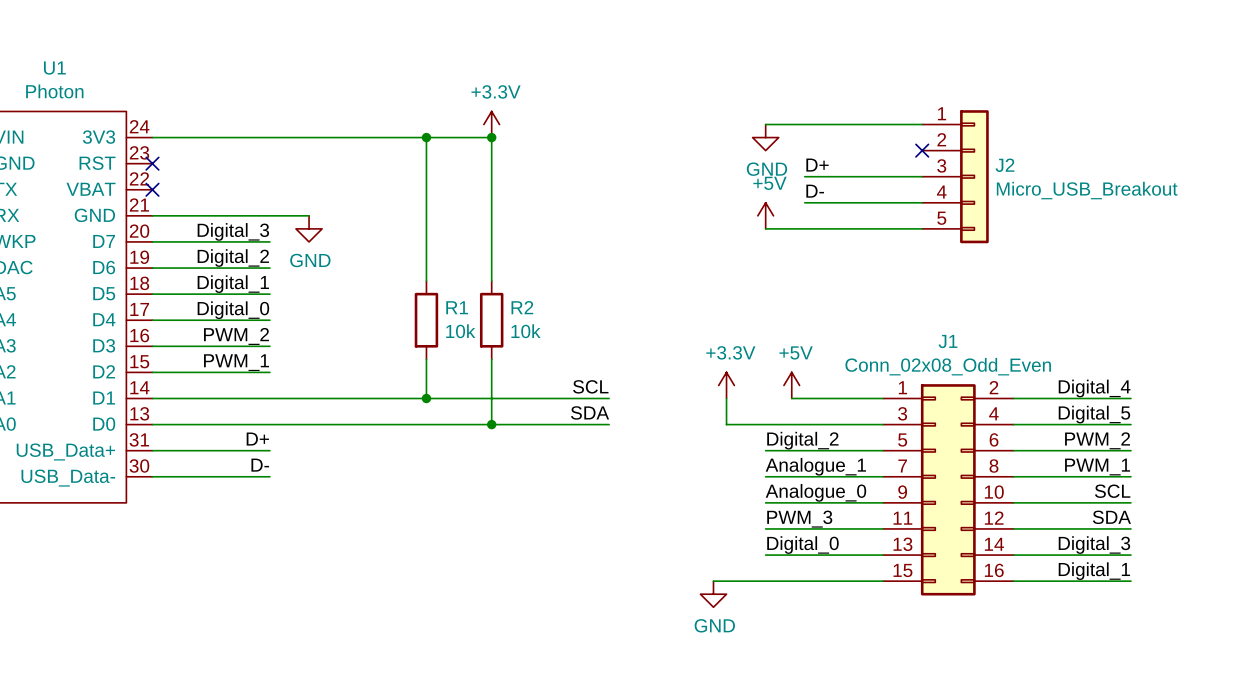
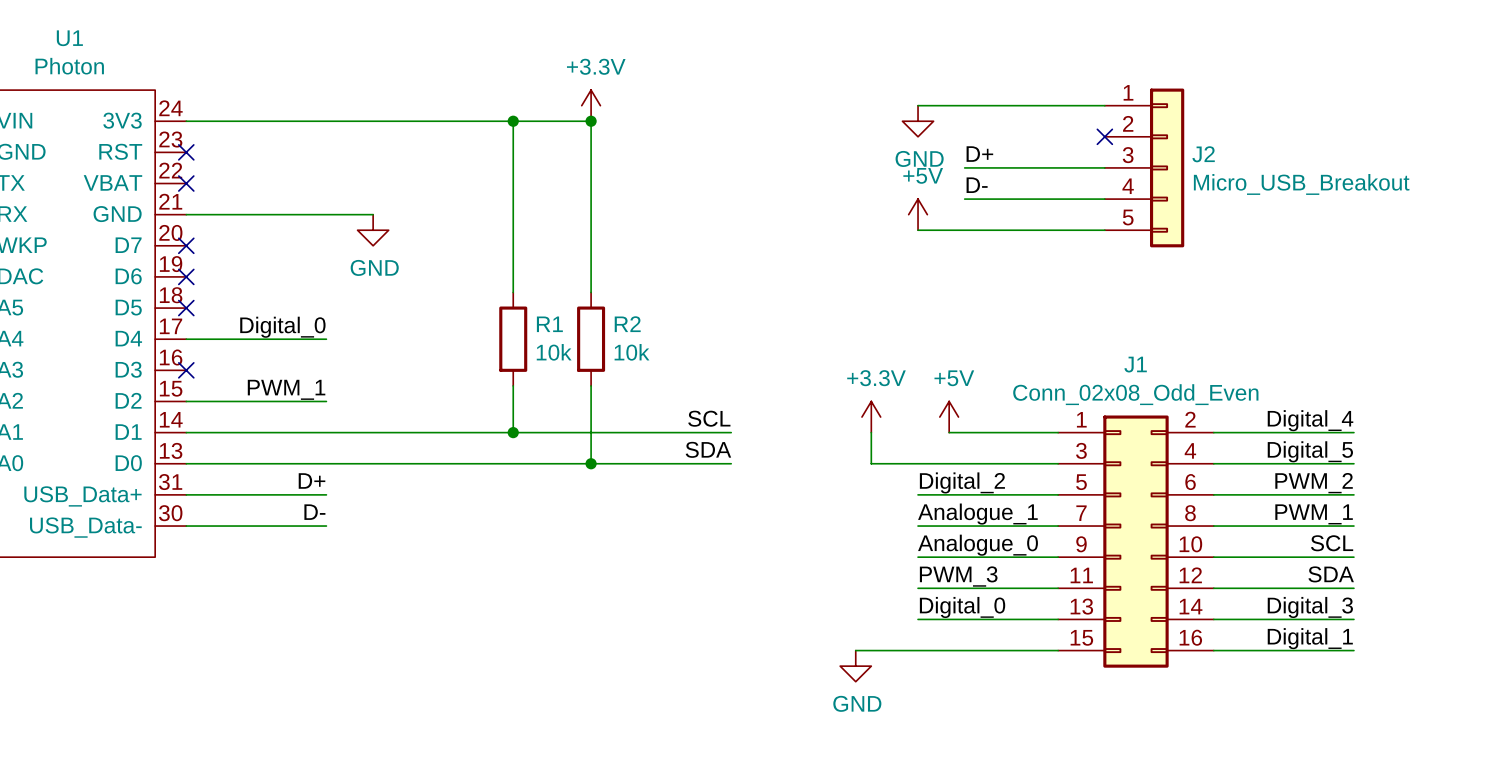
label: Digital_3 (233, 231) -> none
wire: (152, 241) (269, 241) -> none
no-connect mark: none -> (186, 245)
label: Digital_2 (233, 258) -> none
wire: (152, 268) (269, 268) -> none
no-connect mark: none -> (186, 276)
label: Digital_1 (233, 284) -> none
wire: (152, 294) (269, 294) -> none
no-connect mark: none -> (186, 308)
label: PWM_2 (236, 336) -> none
wire: (152, 346) (269, 346) -> none
no-connect mark: none -> (186, 370)

